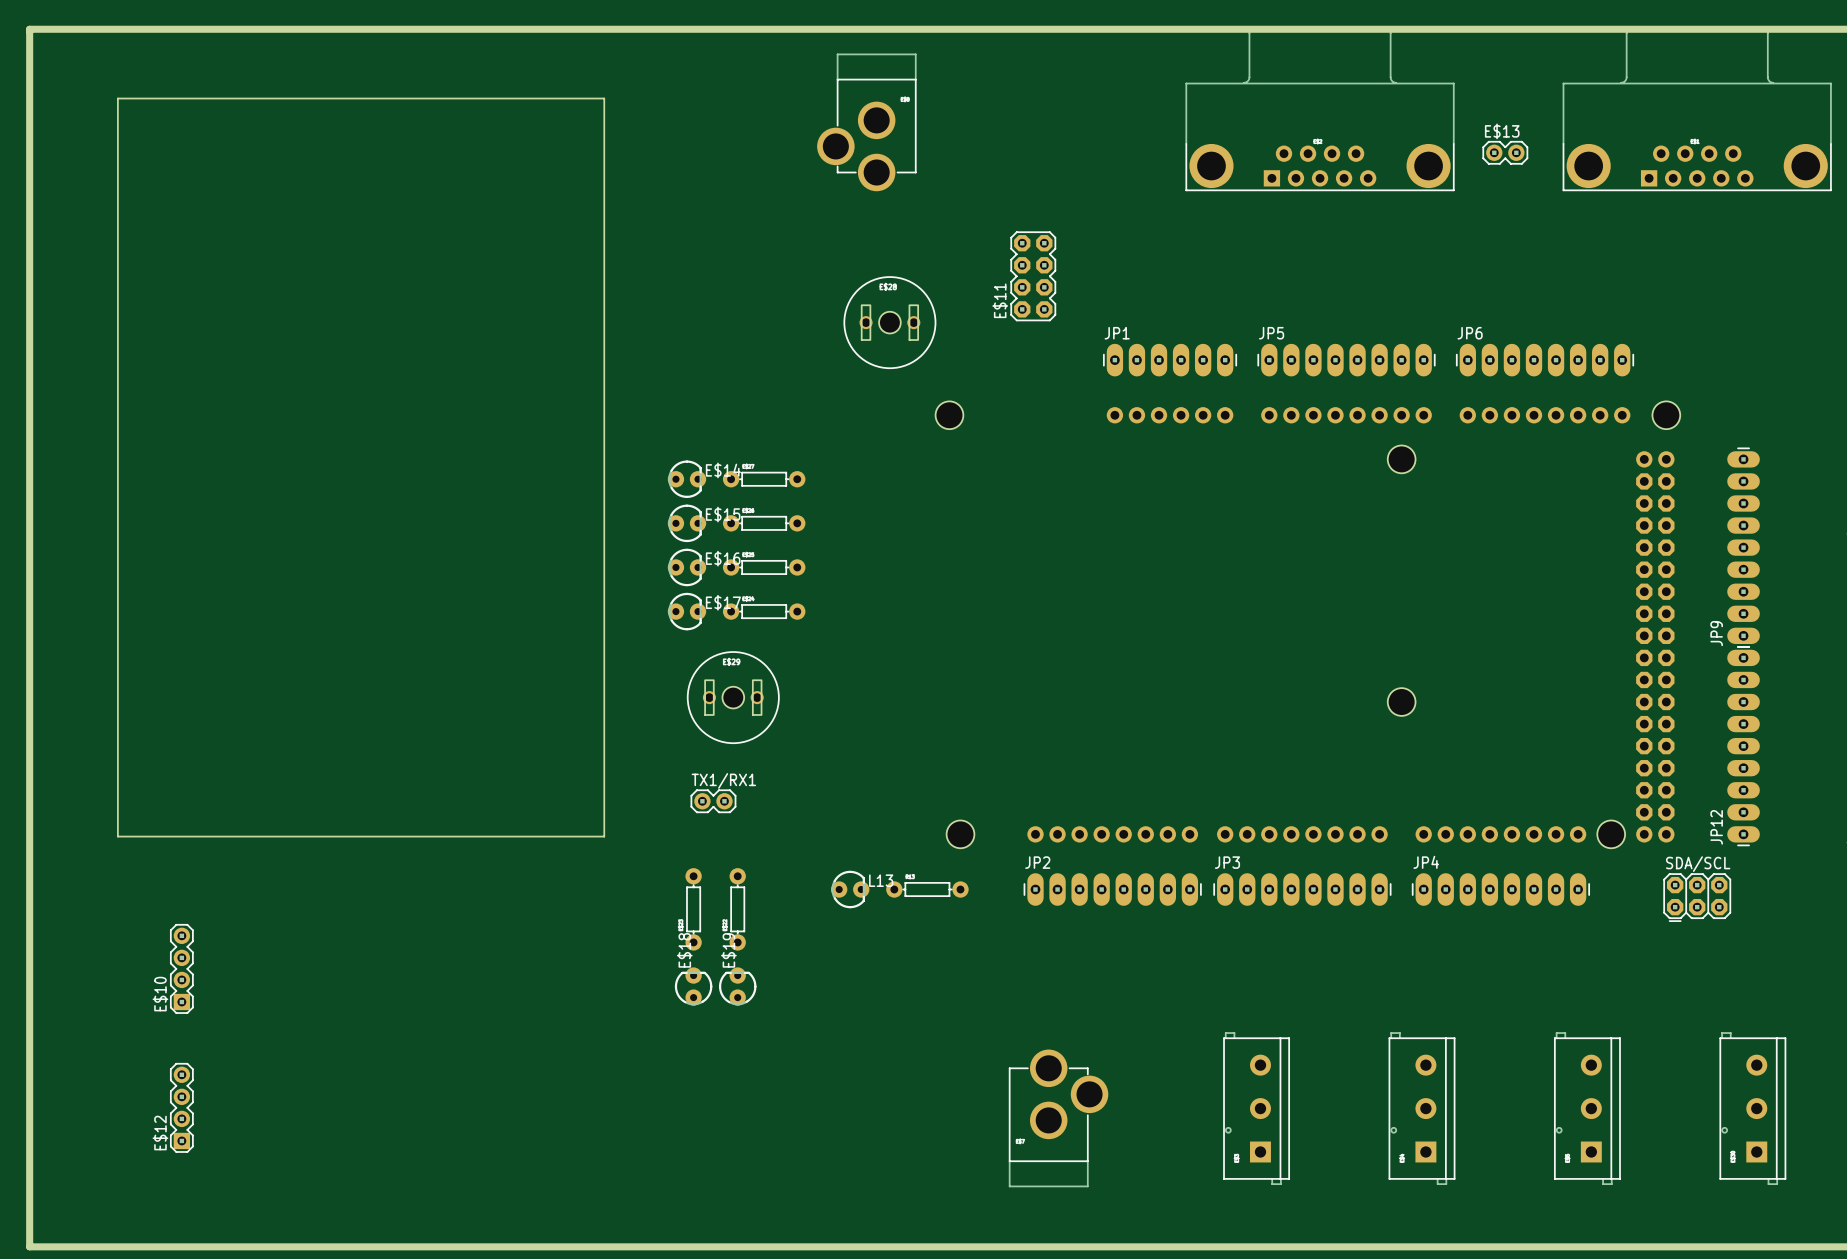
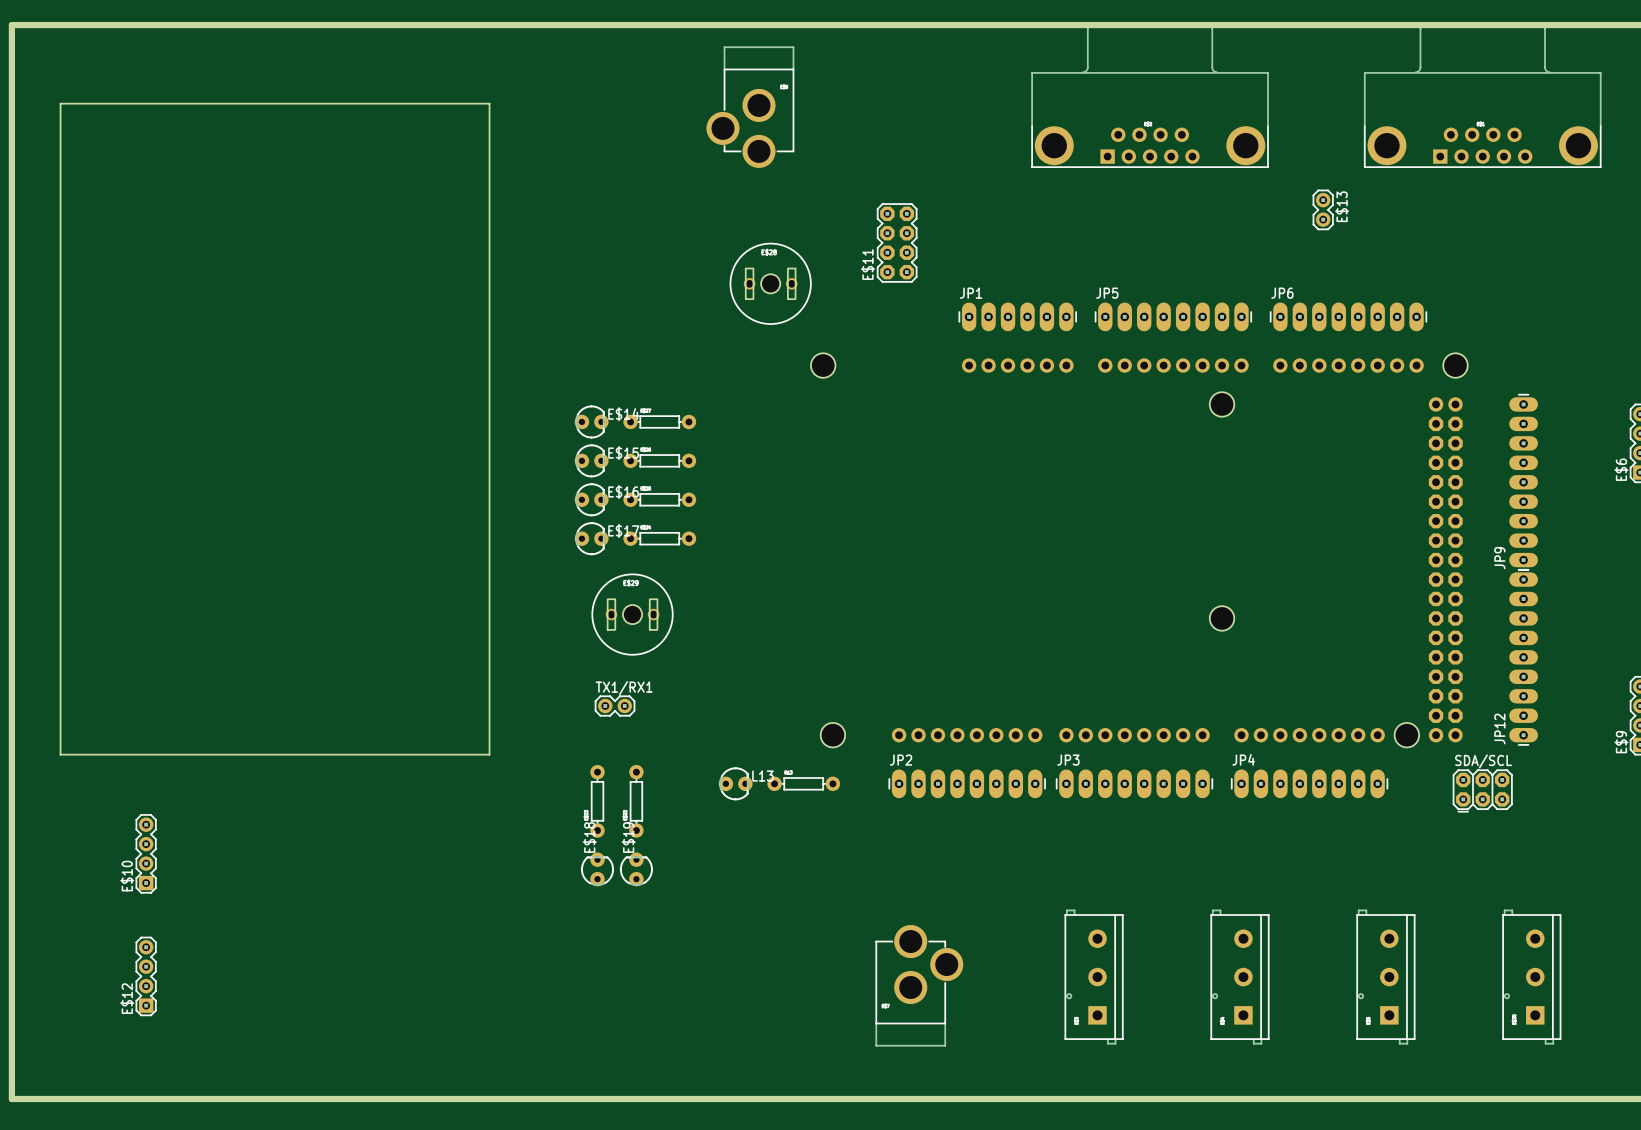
board edge: (117, 98) (604, 98) (604, 836) (117, 836) (117, 98) -> (60, 103) (489, 103) (489, 754) (60, 754) (60, 103)
E$13 rotation: 0° (1505, 152) -> 90° clockwise (1323, 209)
E$13 position: (1505, 152) -> (1323, 209)

